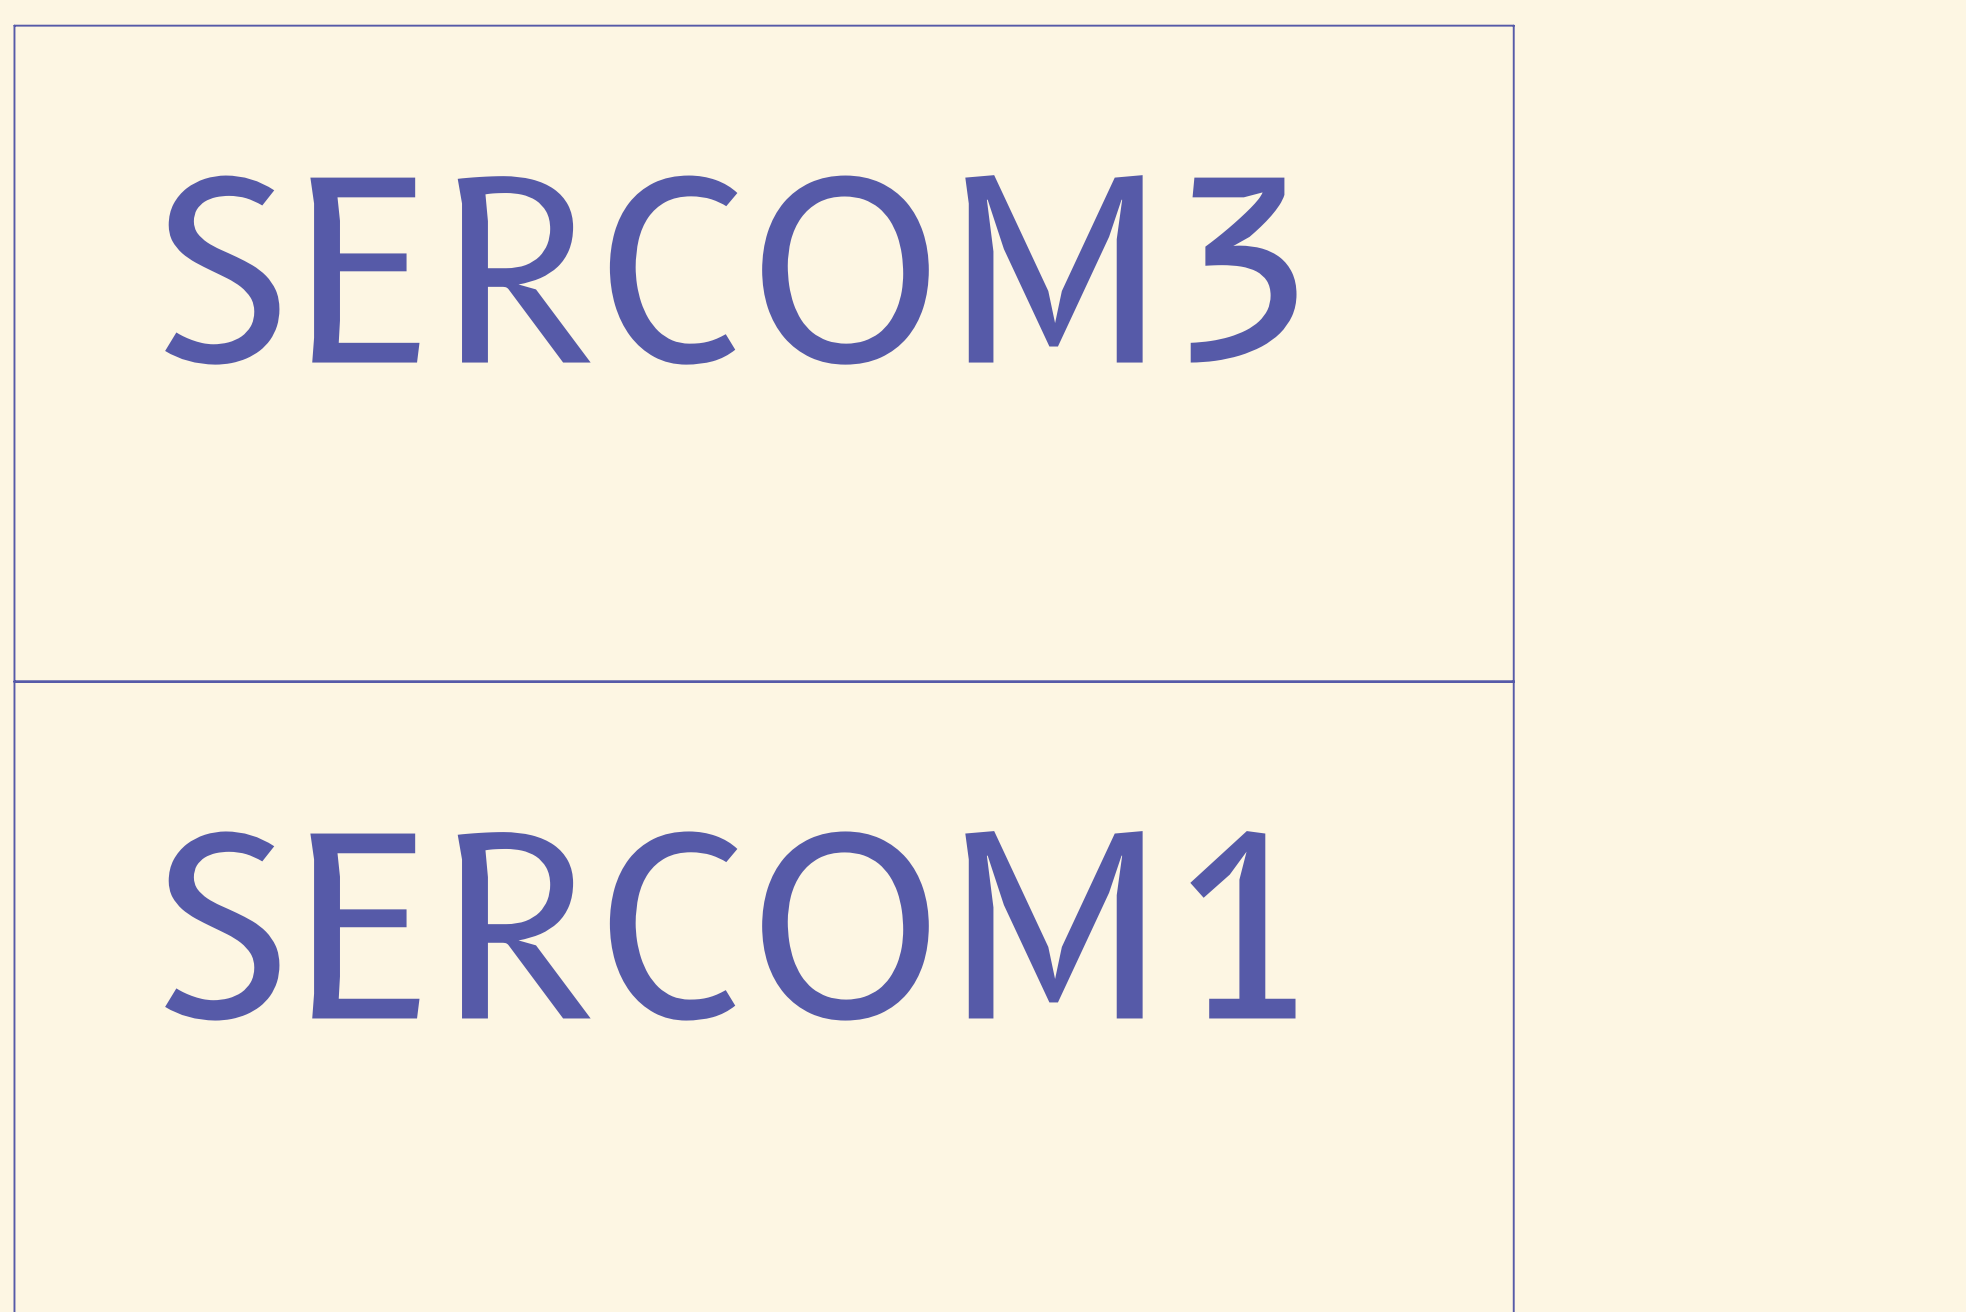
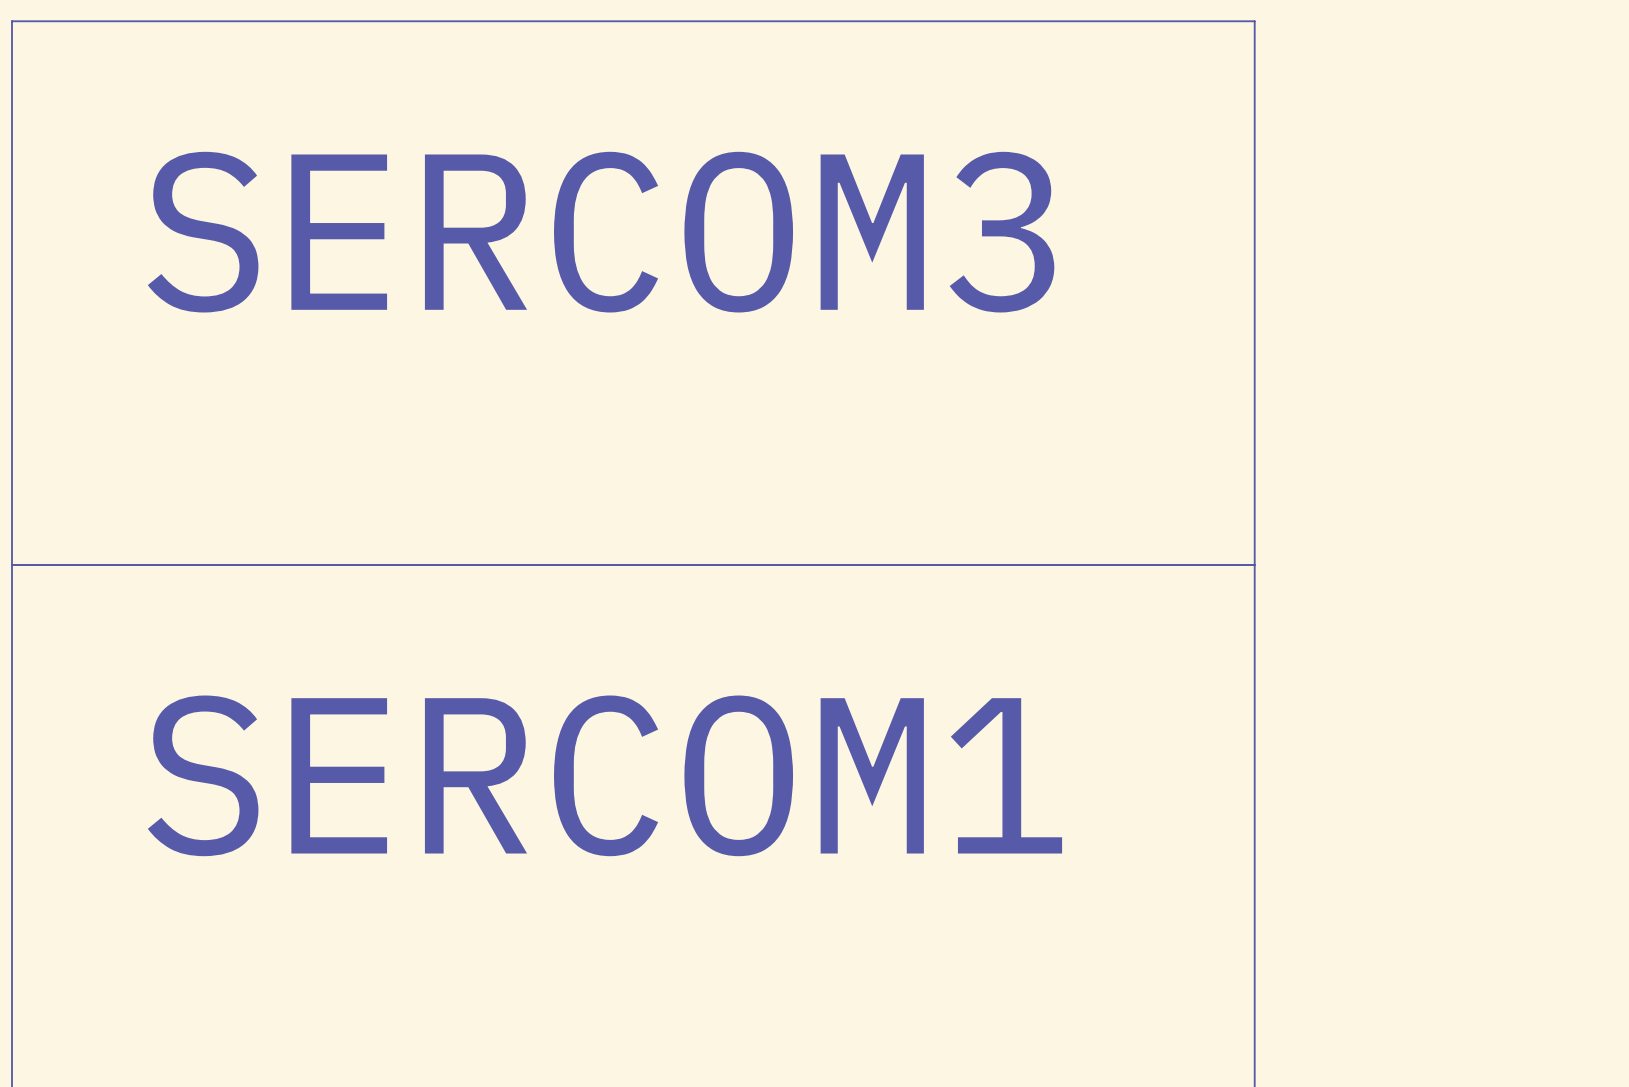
text position: SERCOM3 (730, 269) -> SERCOM3 (601, 232)
text position: SERCOM1 (730, 925) -> SERCOM1 (604, 775)

